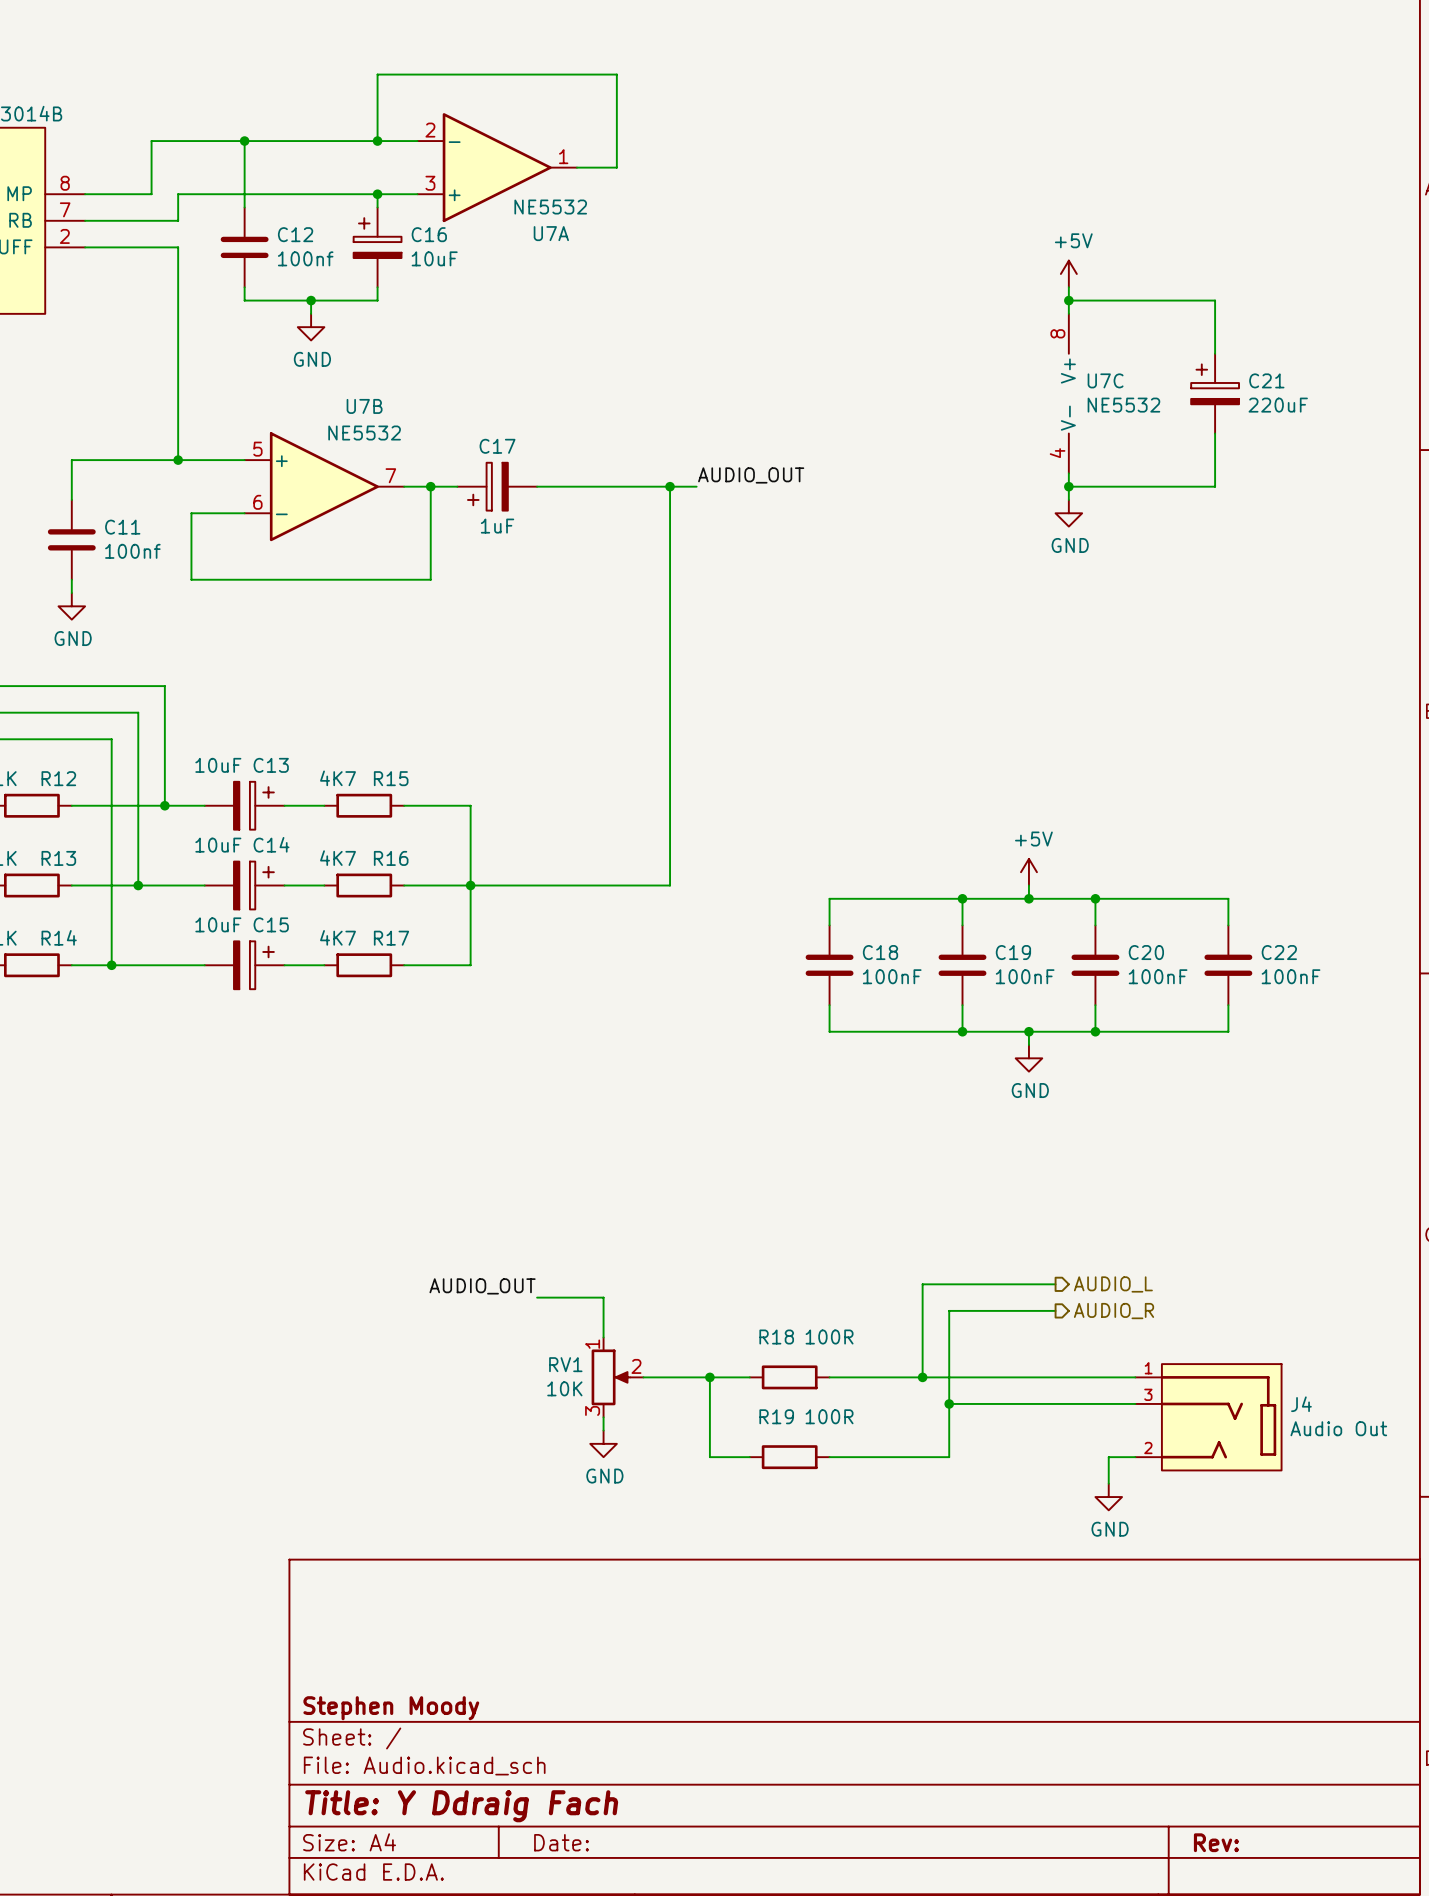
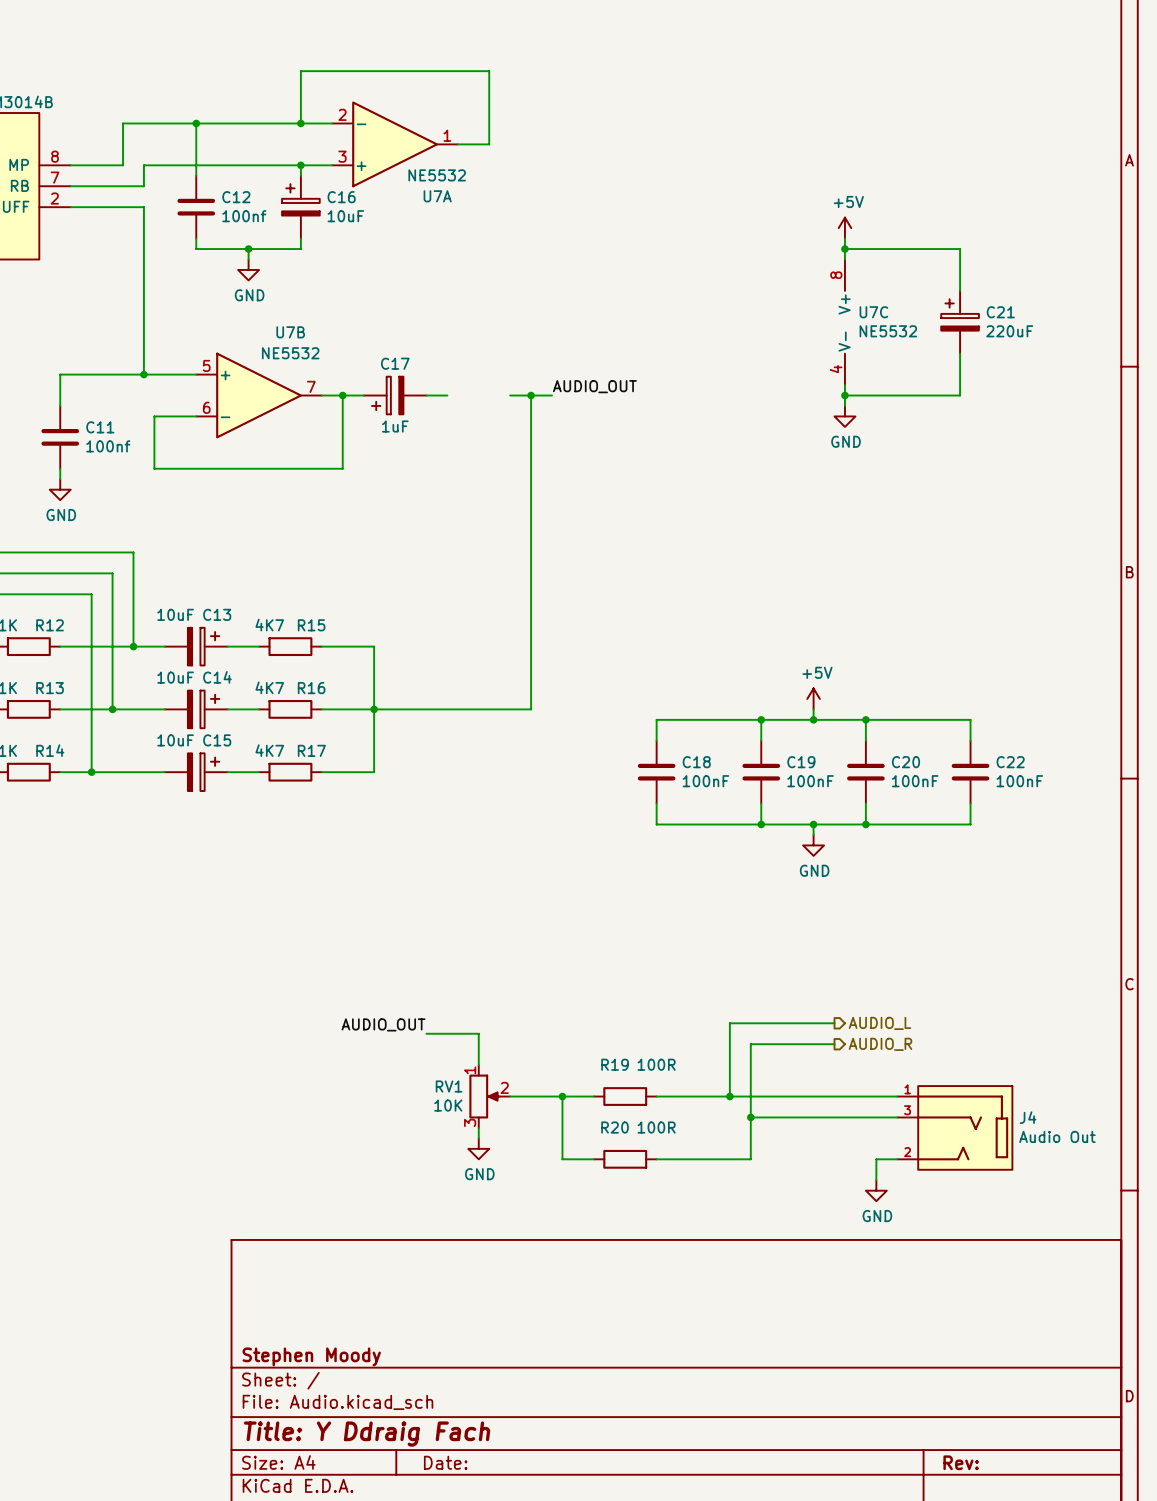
wire: (563, 486) (643, 486) -> none
R18 name: R18 (776, 1337) -> R19 (615, 1064)
R19 name: R19 (776, 1416) -> R20 (615, 1127)

